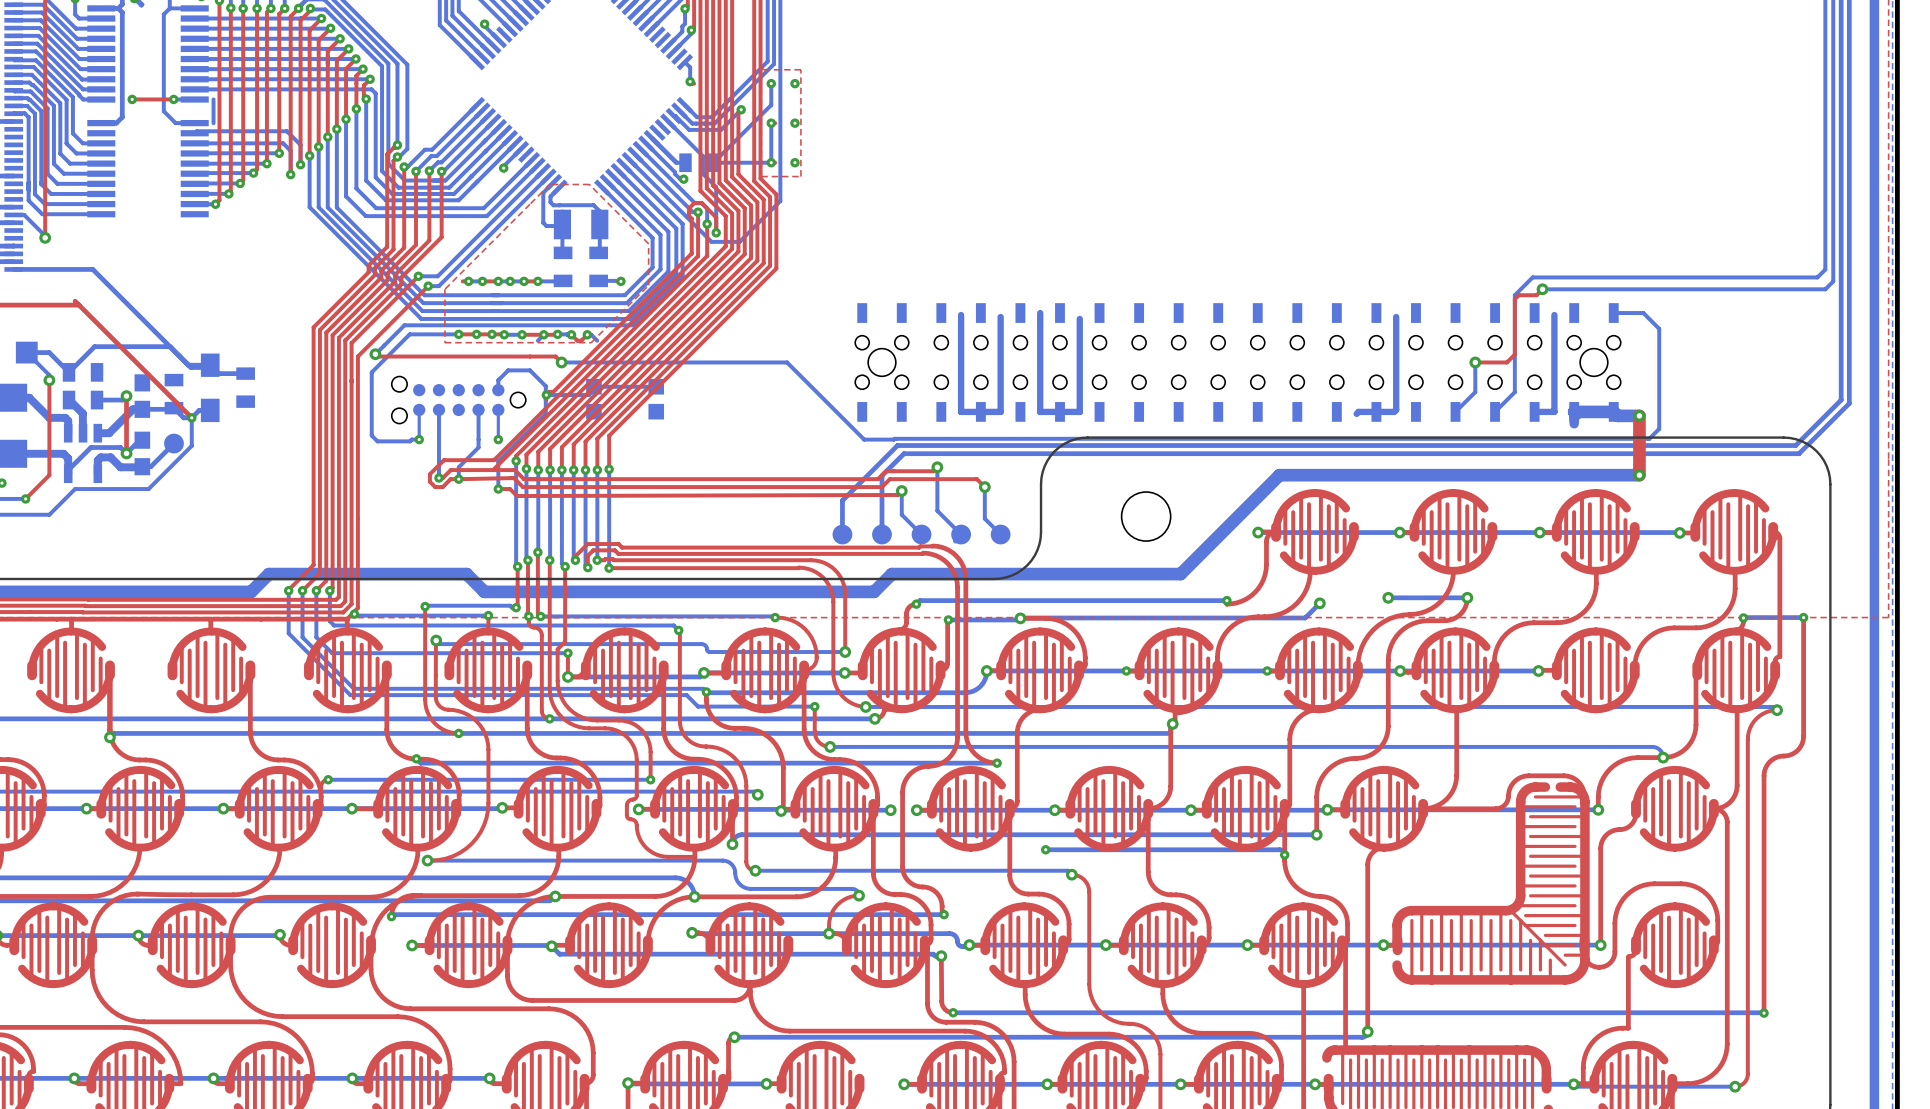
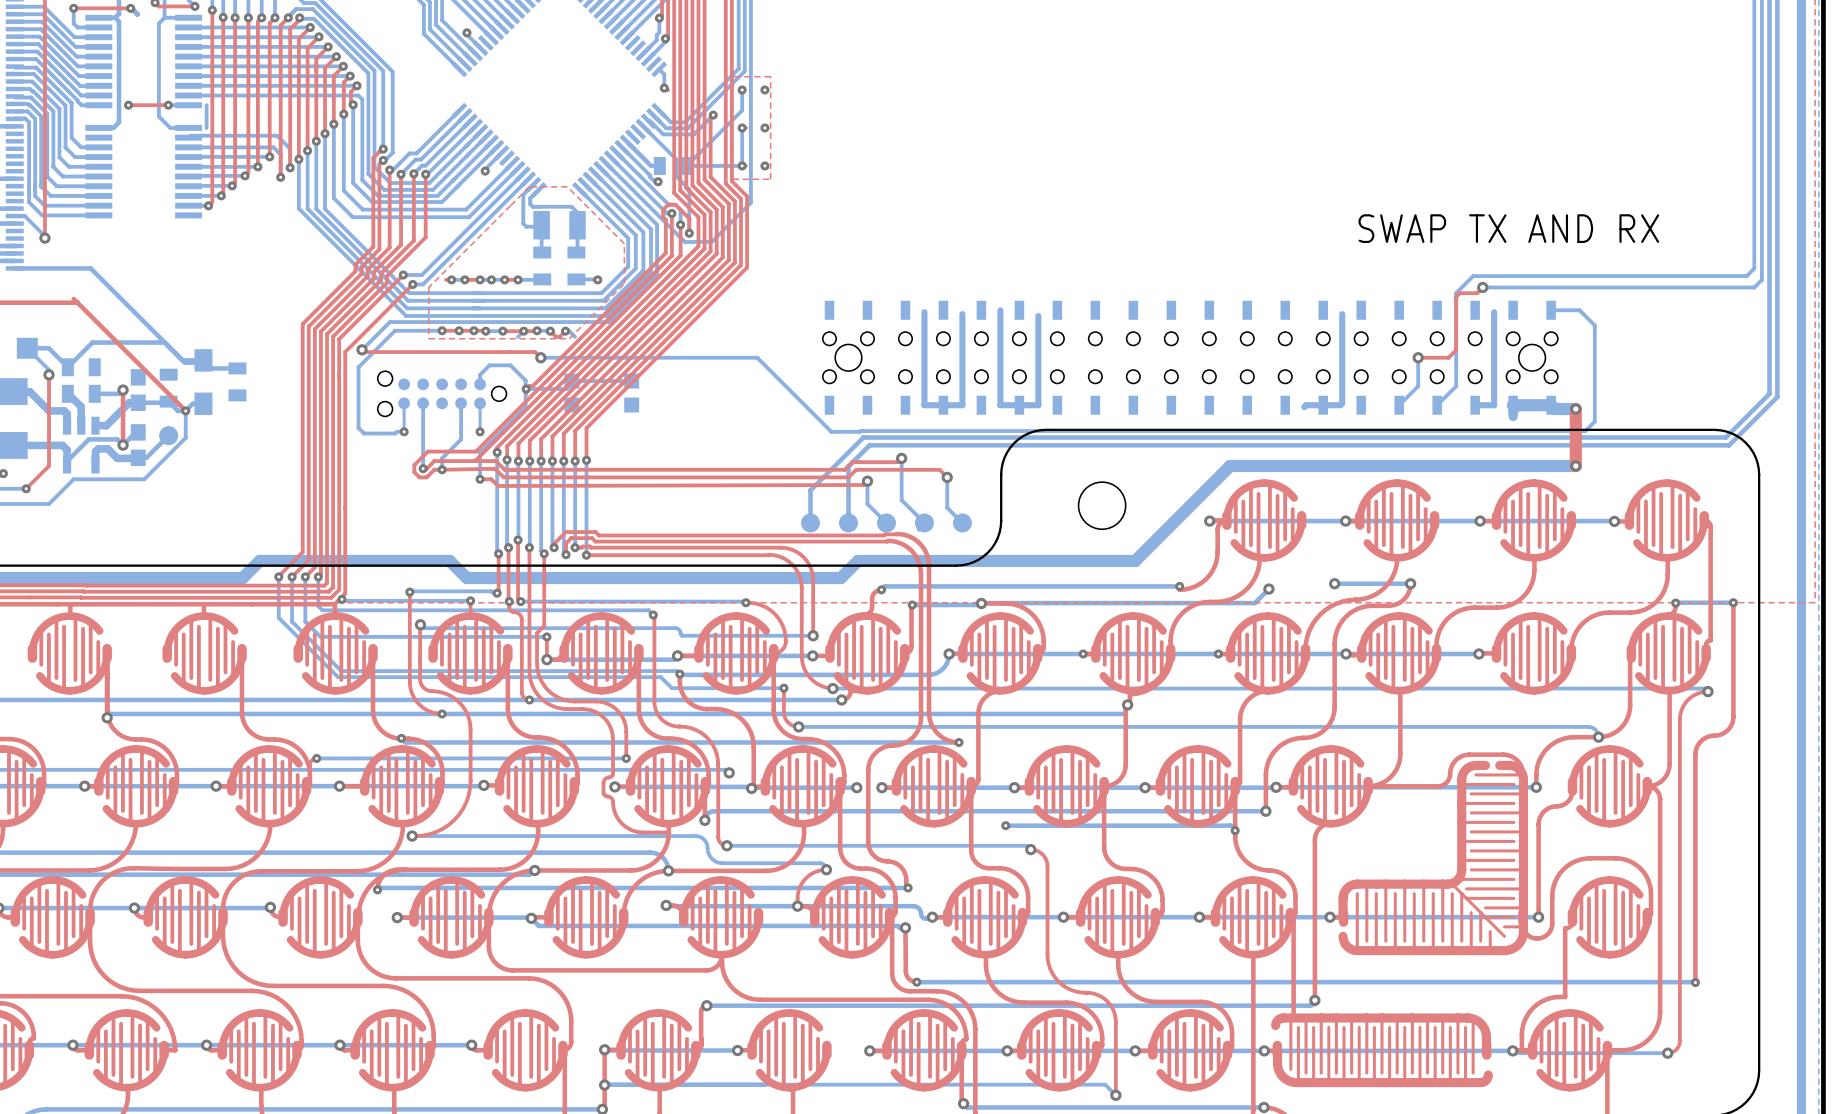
text: none -> SWAP TX AND RX (1508, 228)

